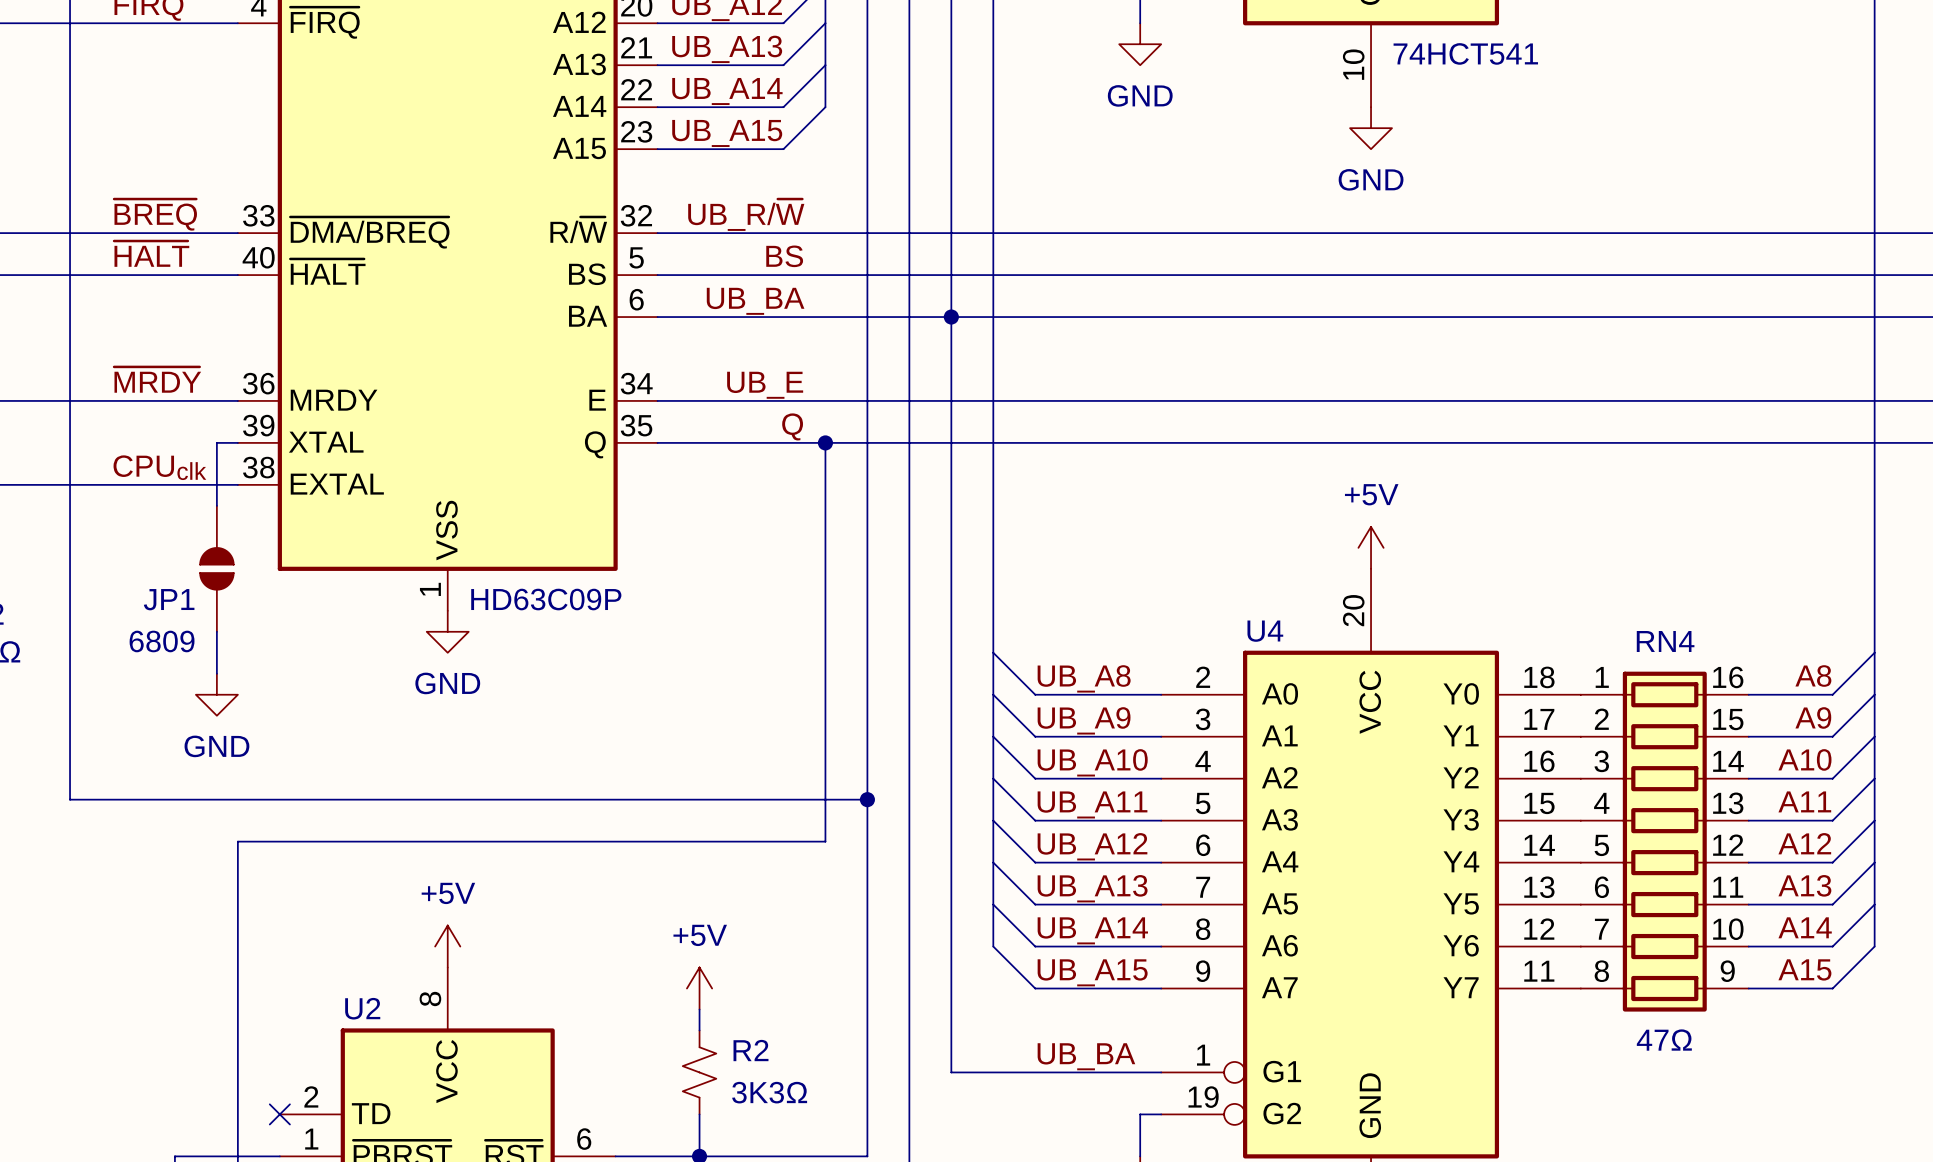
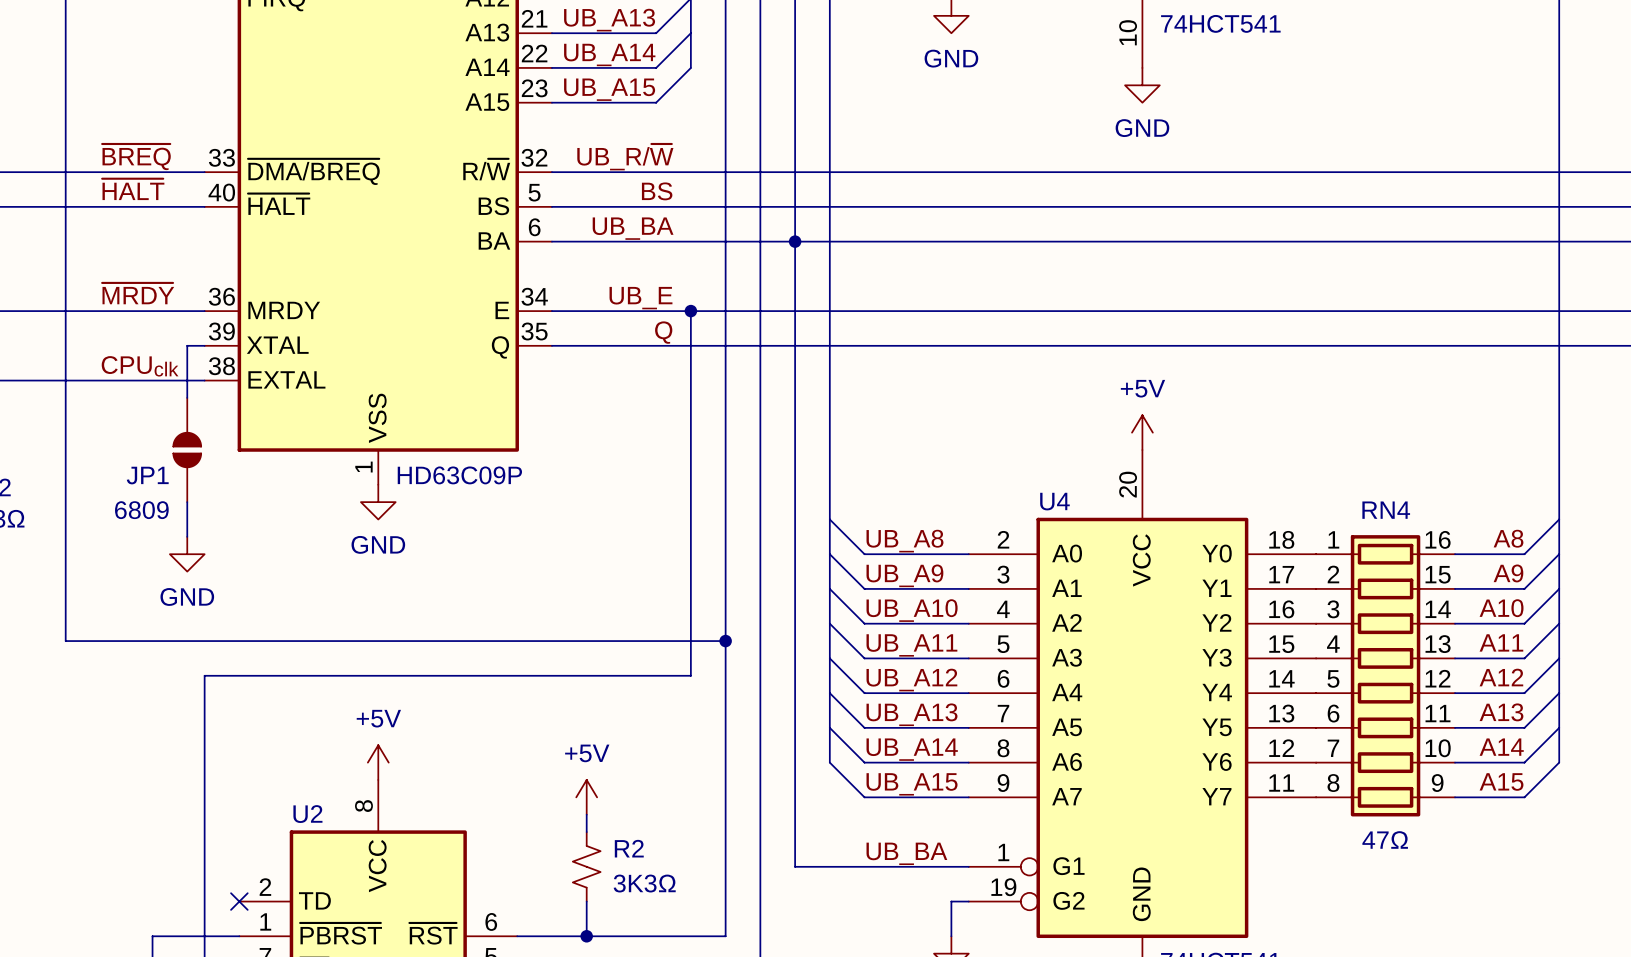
wire: none -> (690, 311) (690, 345)
junction position: (825, 442) -> (690, 311)

